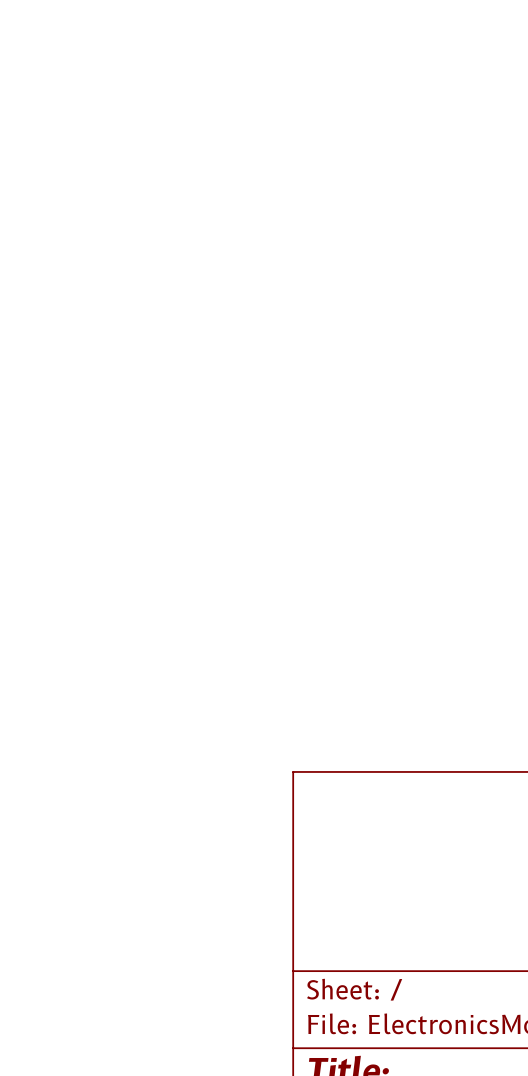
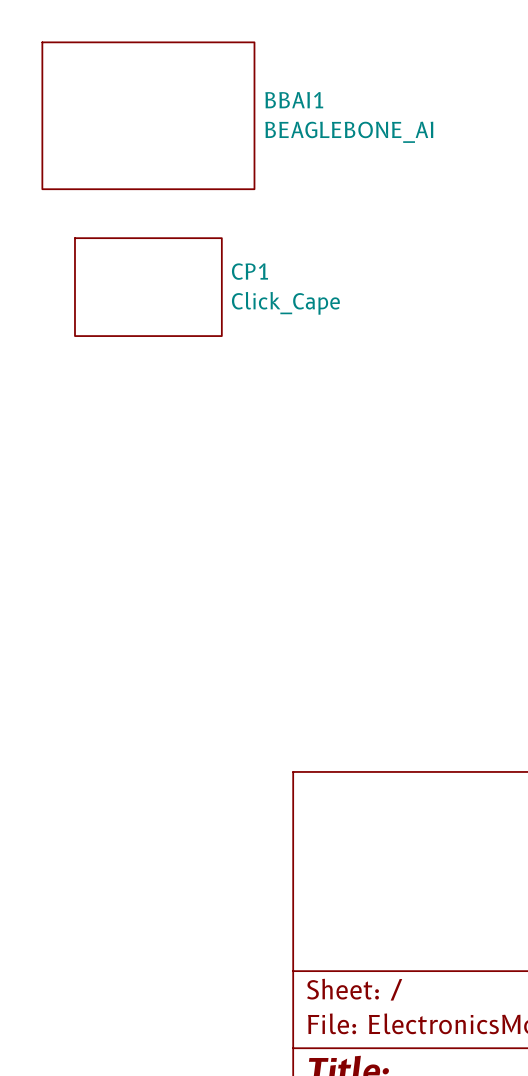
BBAI1: none -> BEAGLEBONE_AI (148, 115)
CP1: none -> Click_Cape (148, 287)

